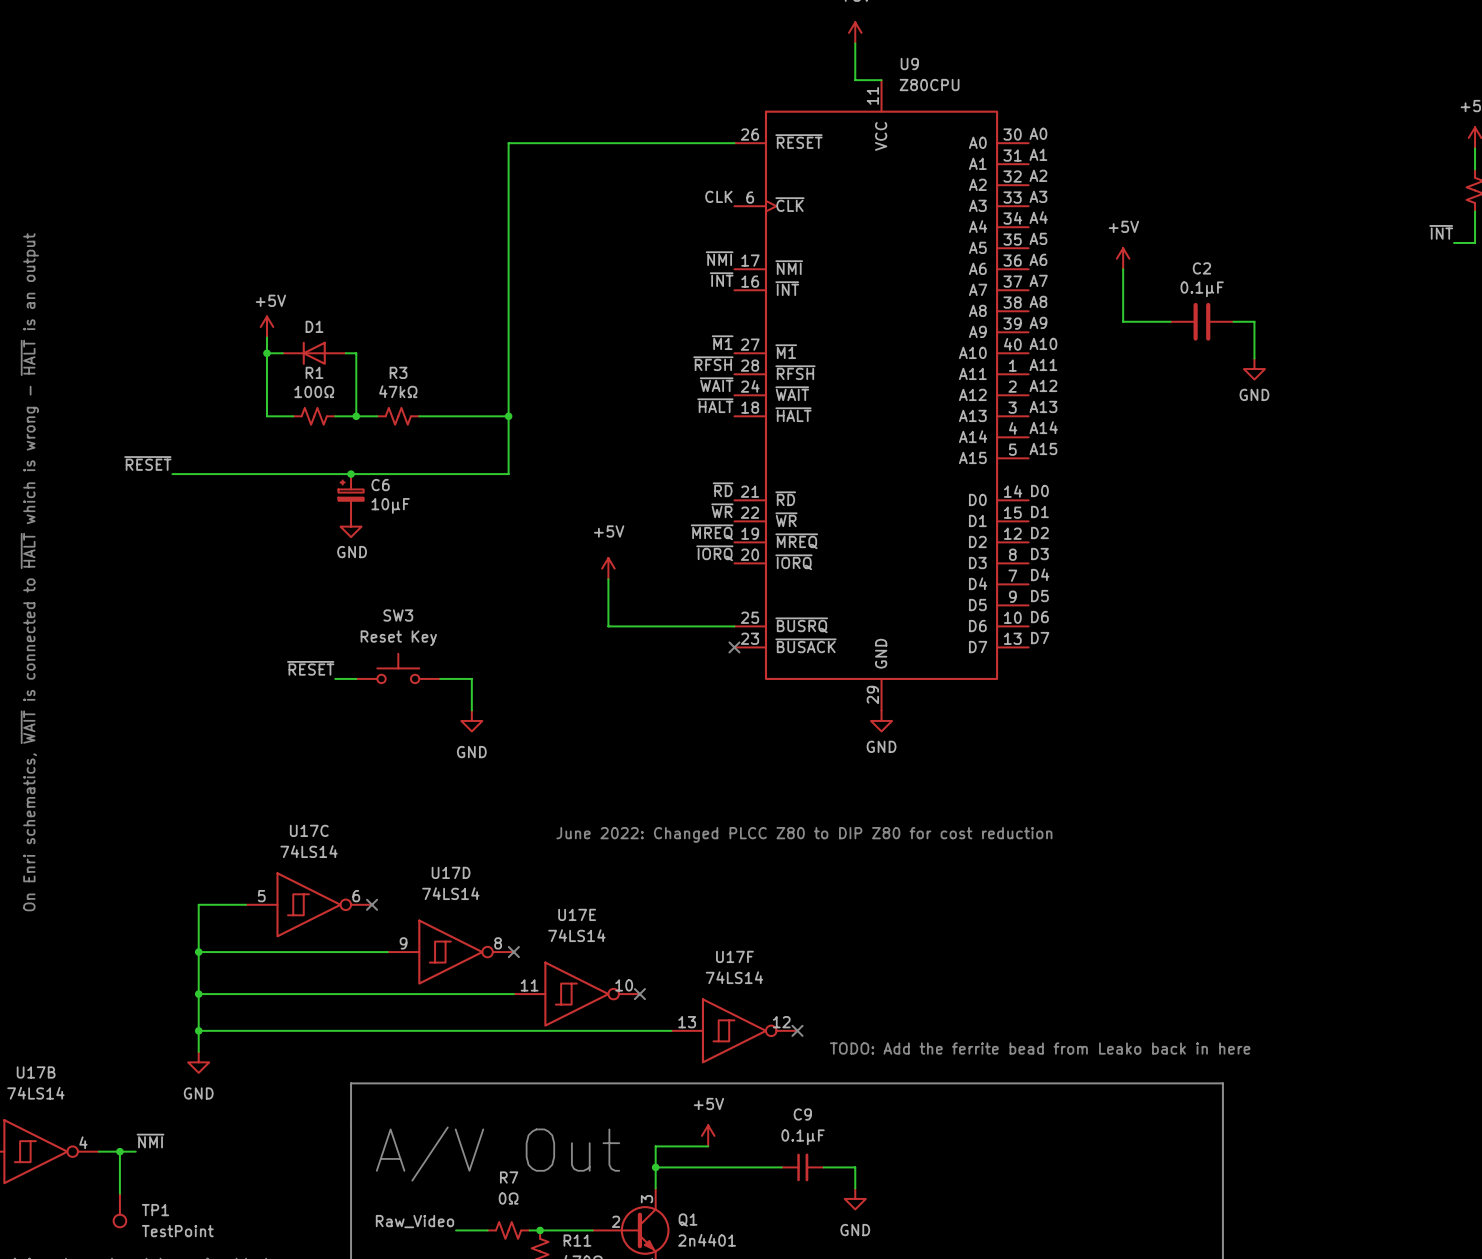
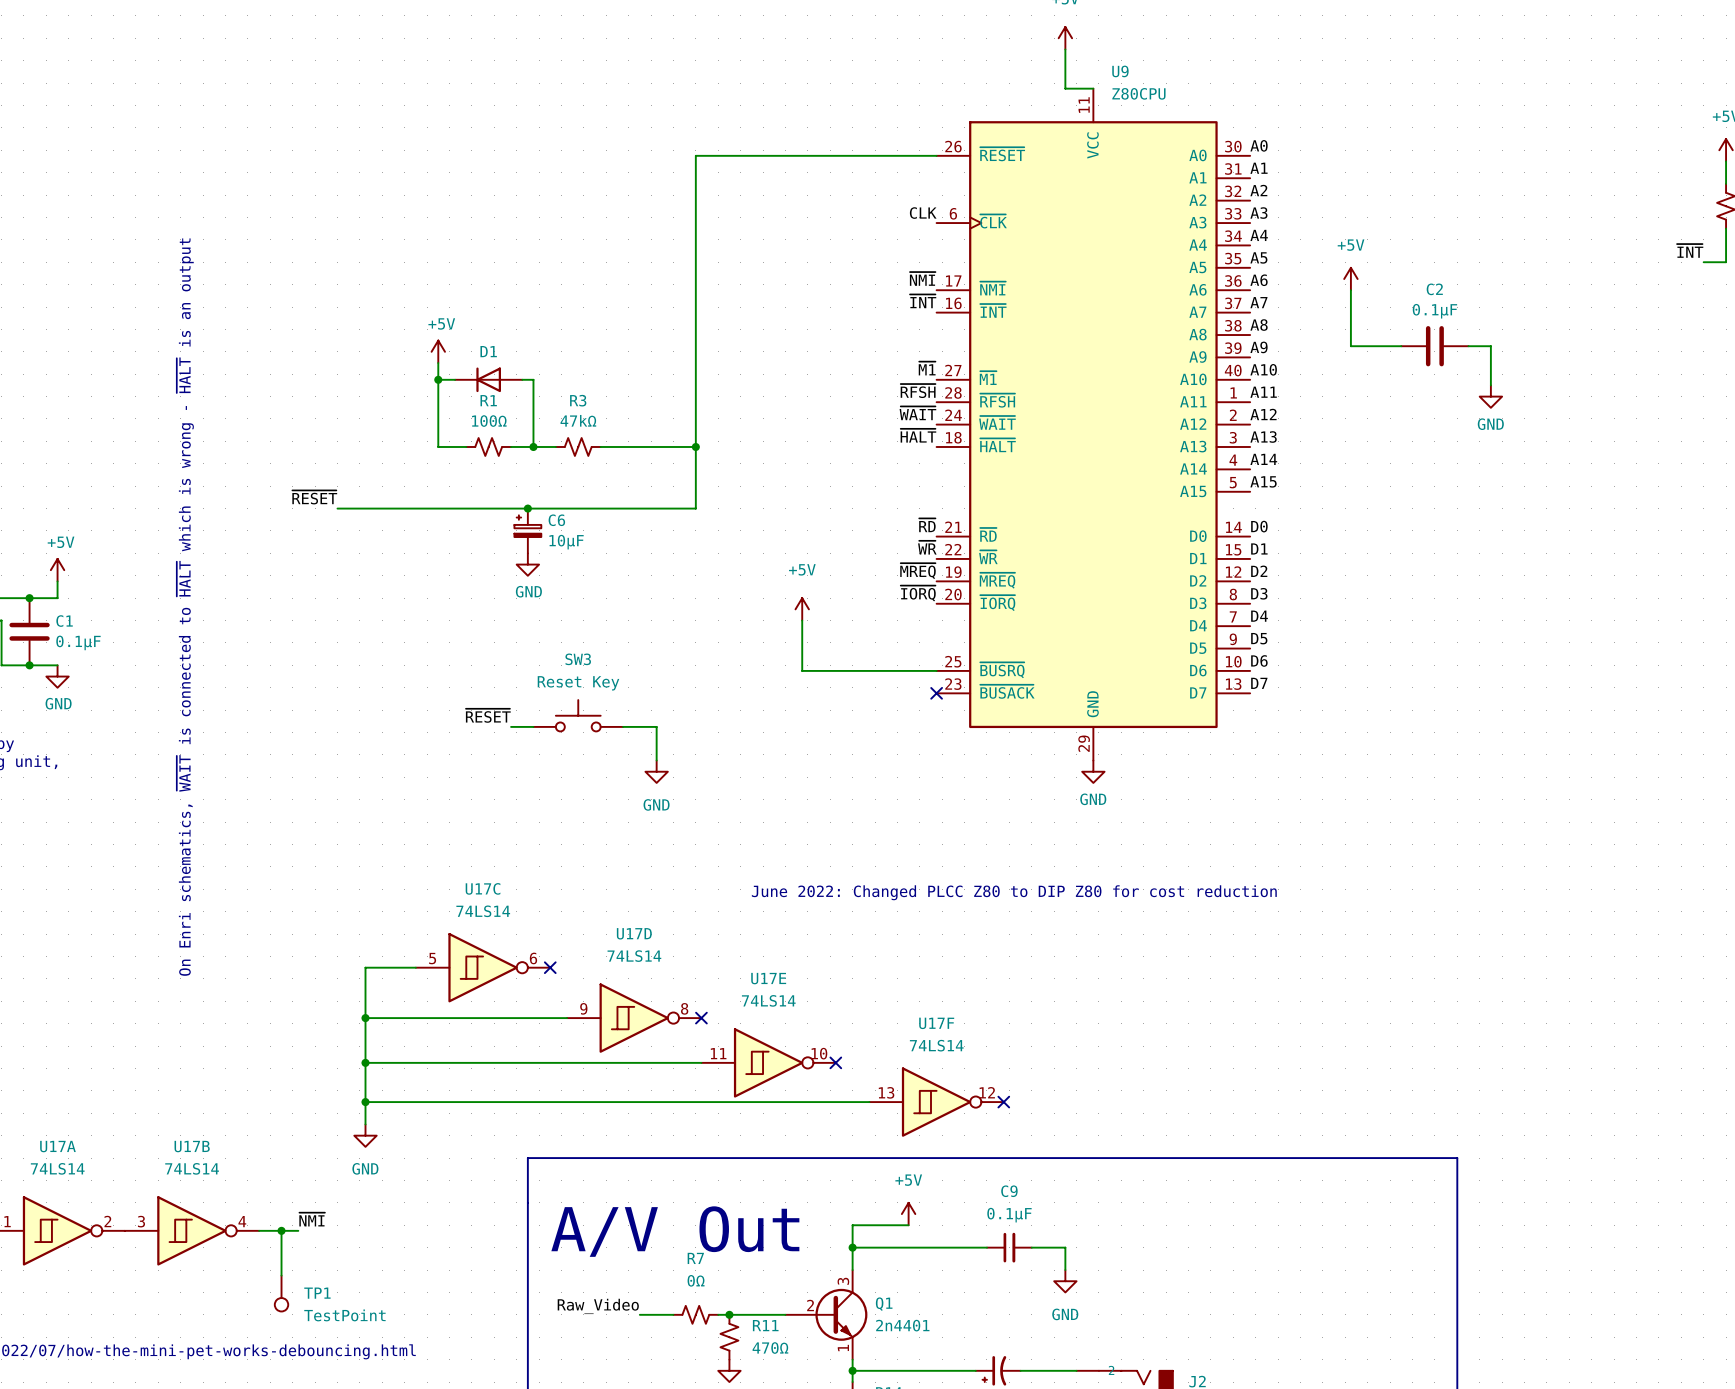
text: TODO: Add the ferrite bead from Leako back in here (1040, 1048) -> none

